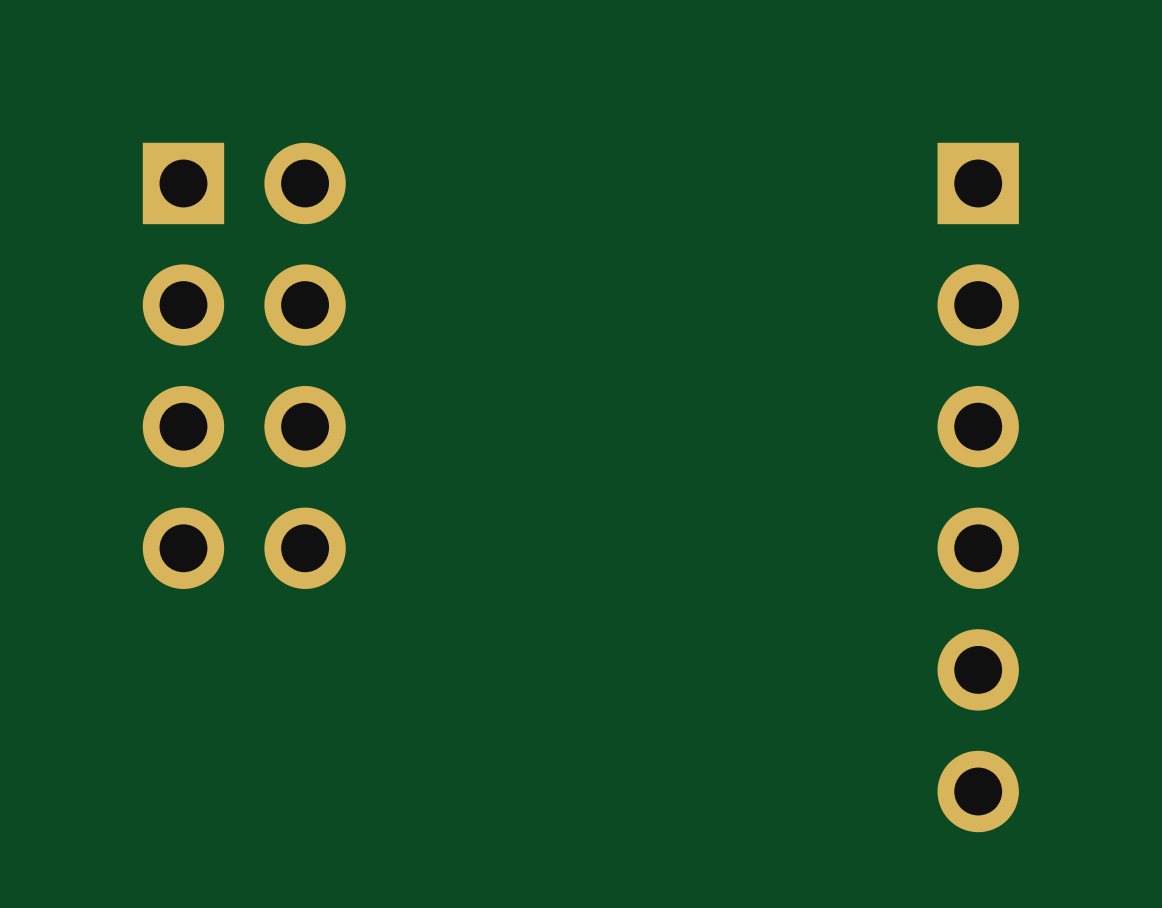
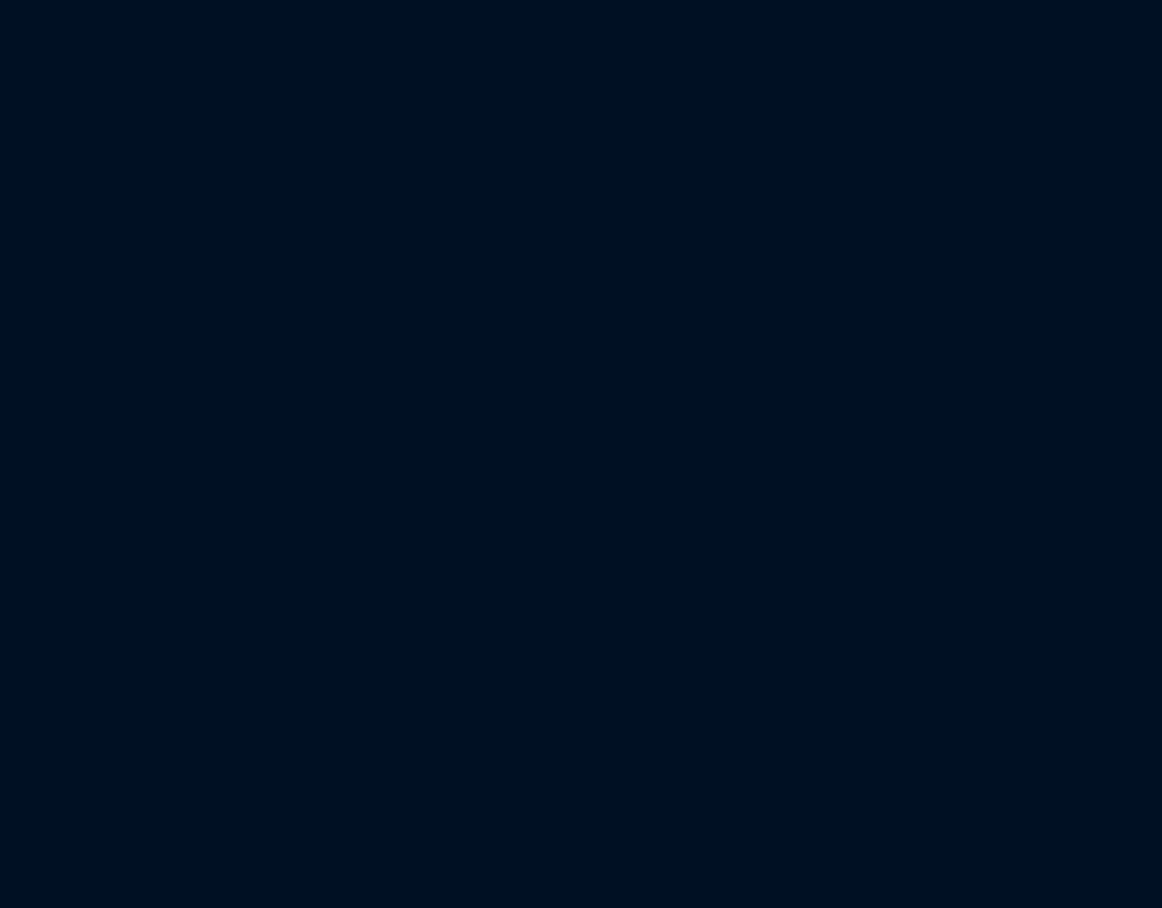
part: (244, 365) -> none
part: (978, 487) -> none

